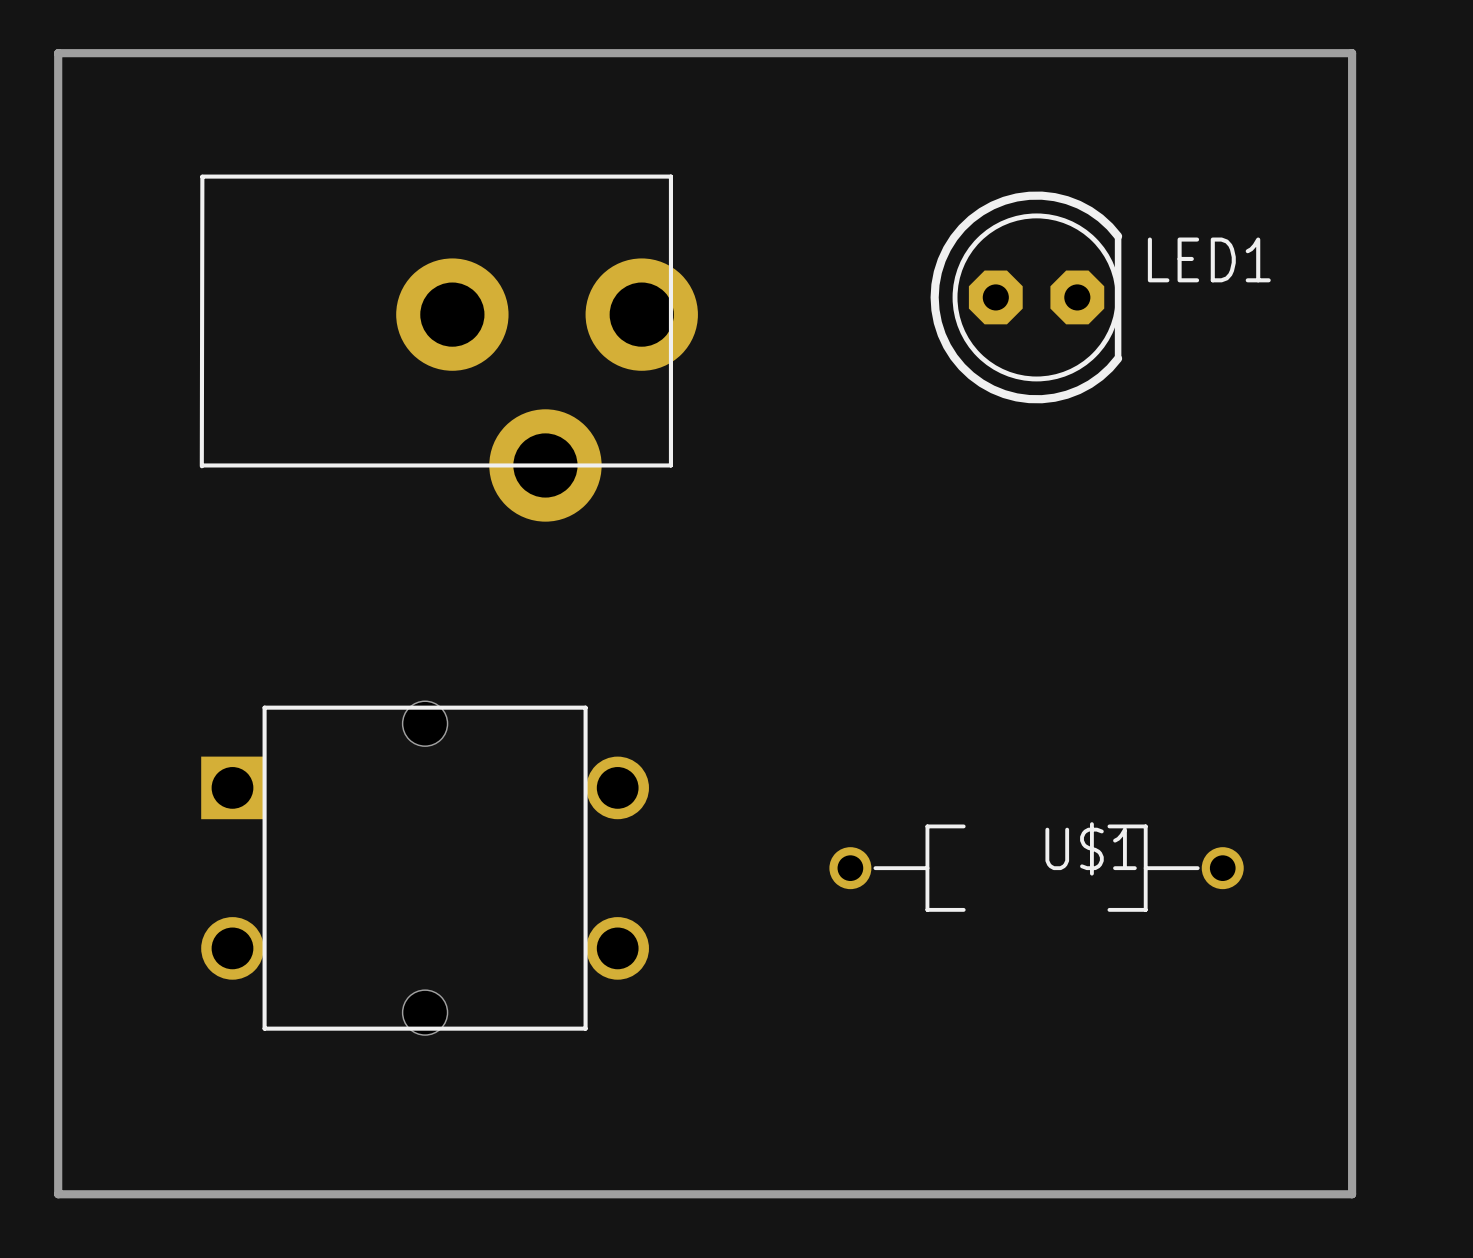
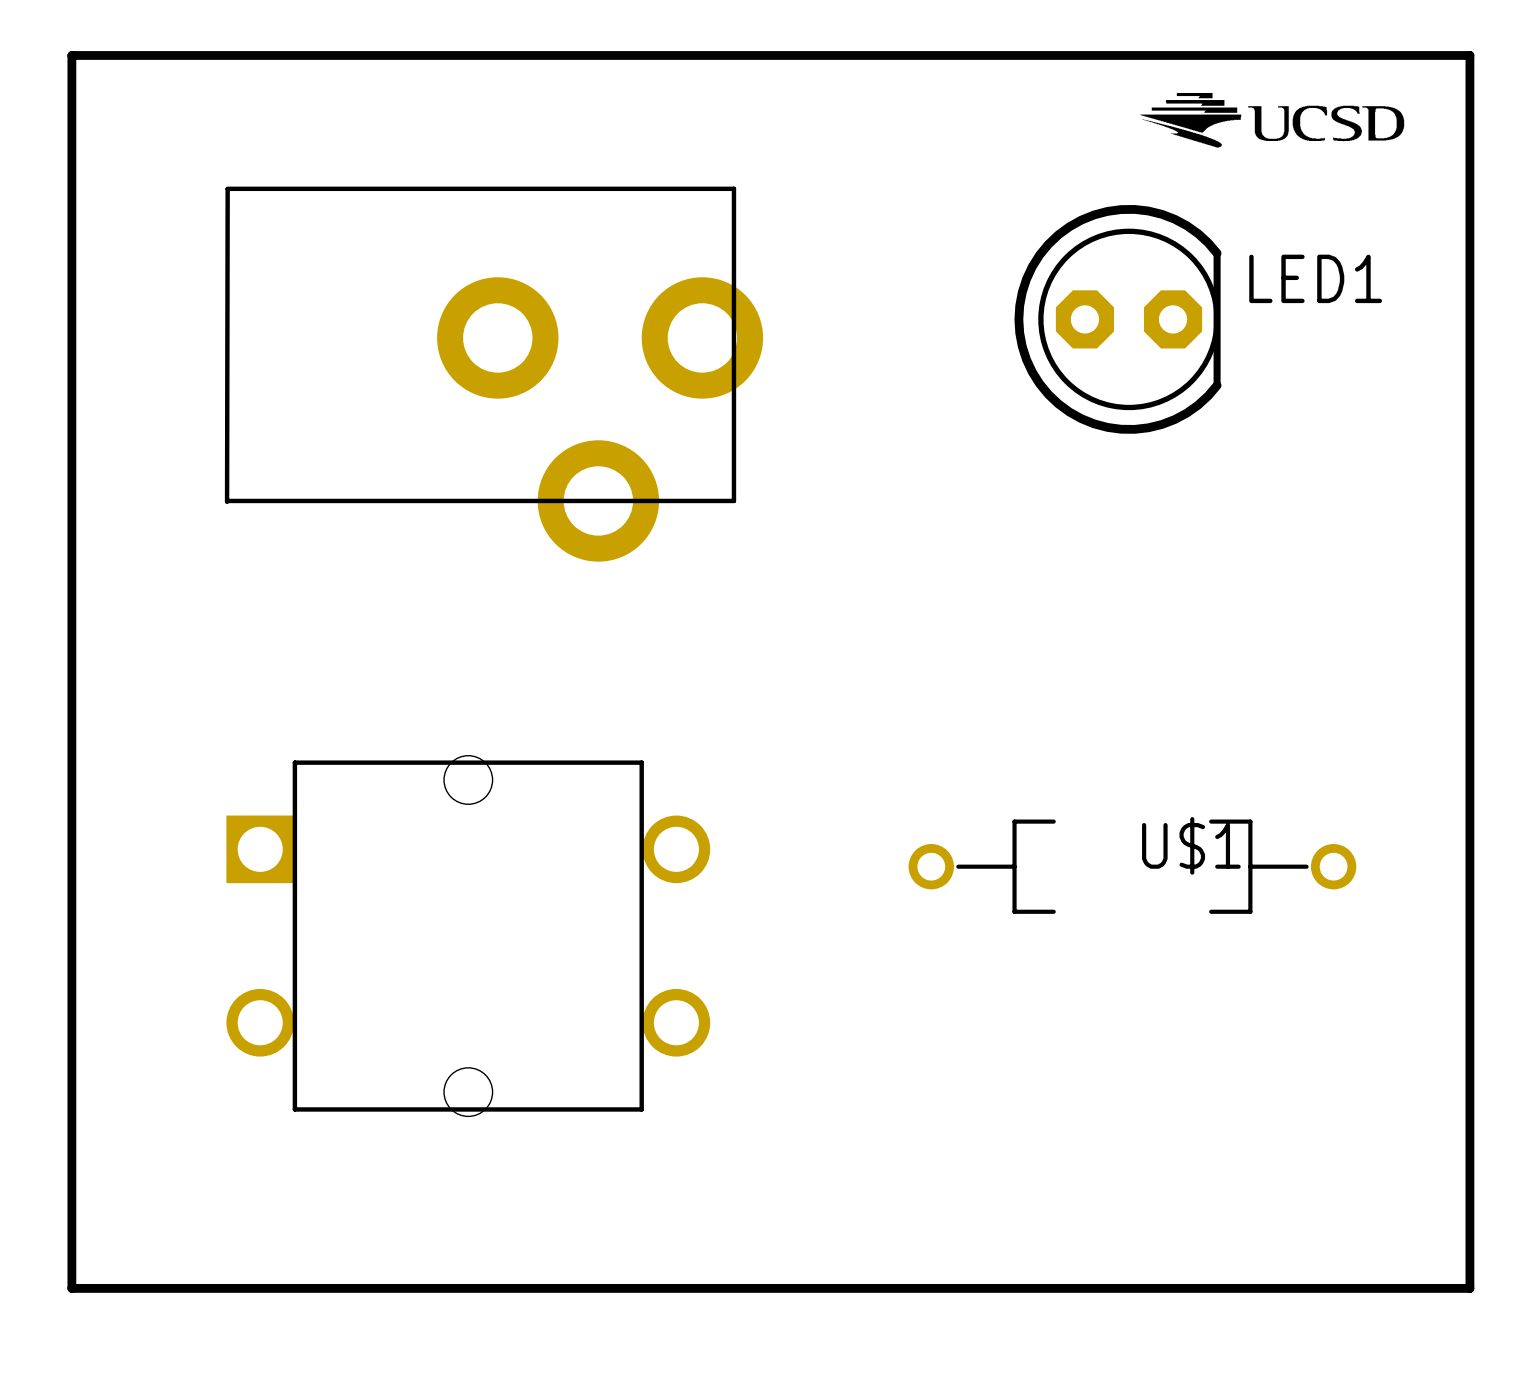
drawing: none -> [1140, 92, 1405, 148]
U$1 position: (1036, 868) -> (1132, 866)

